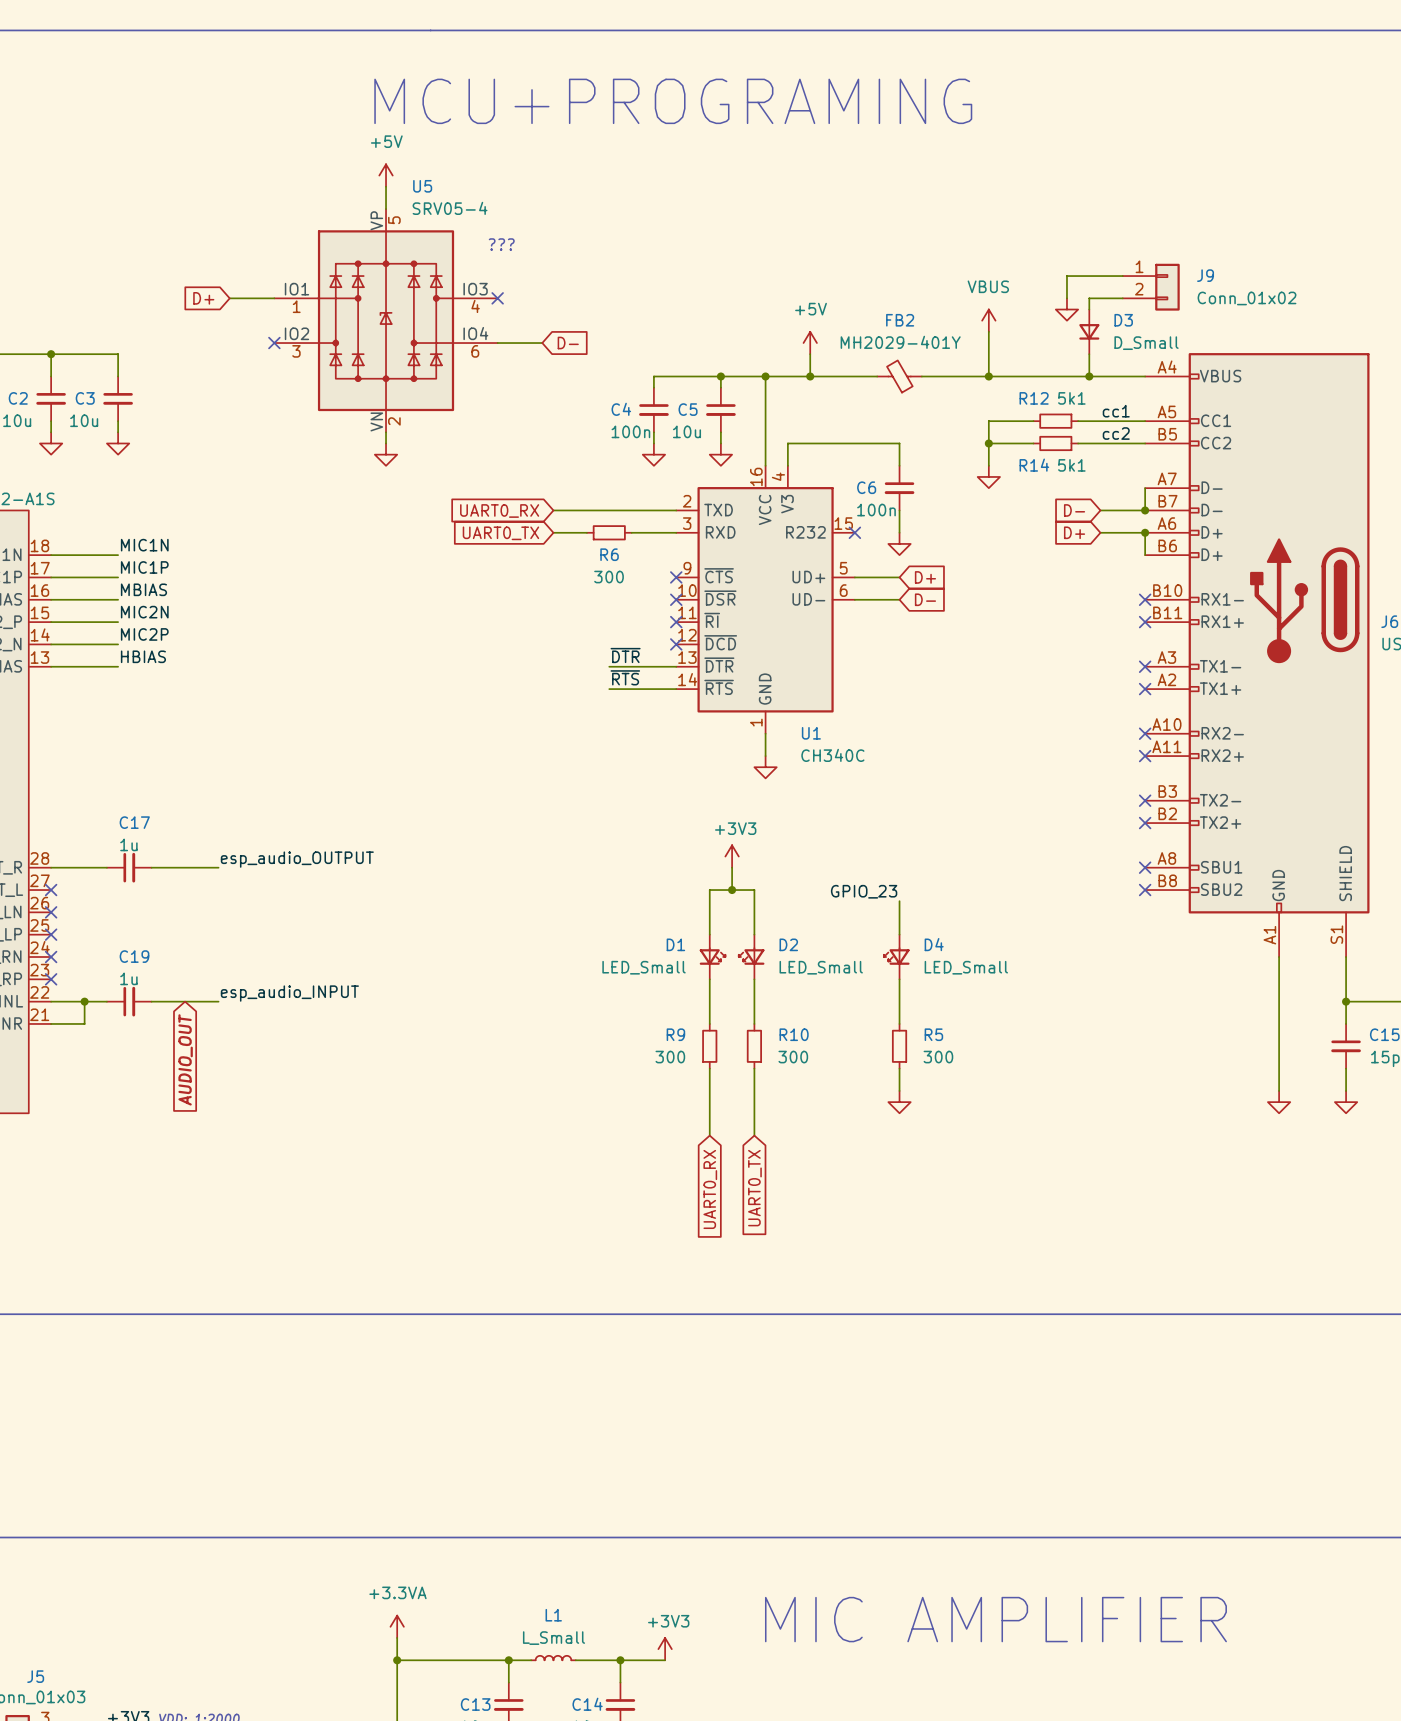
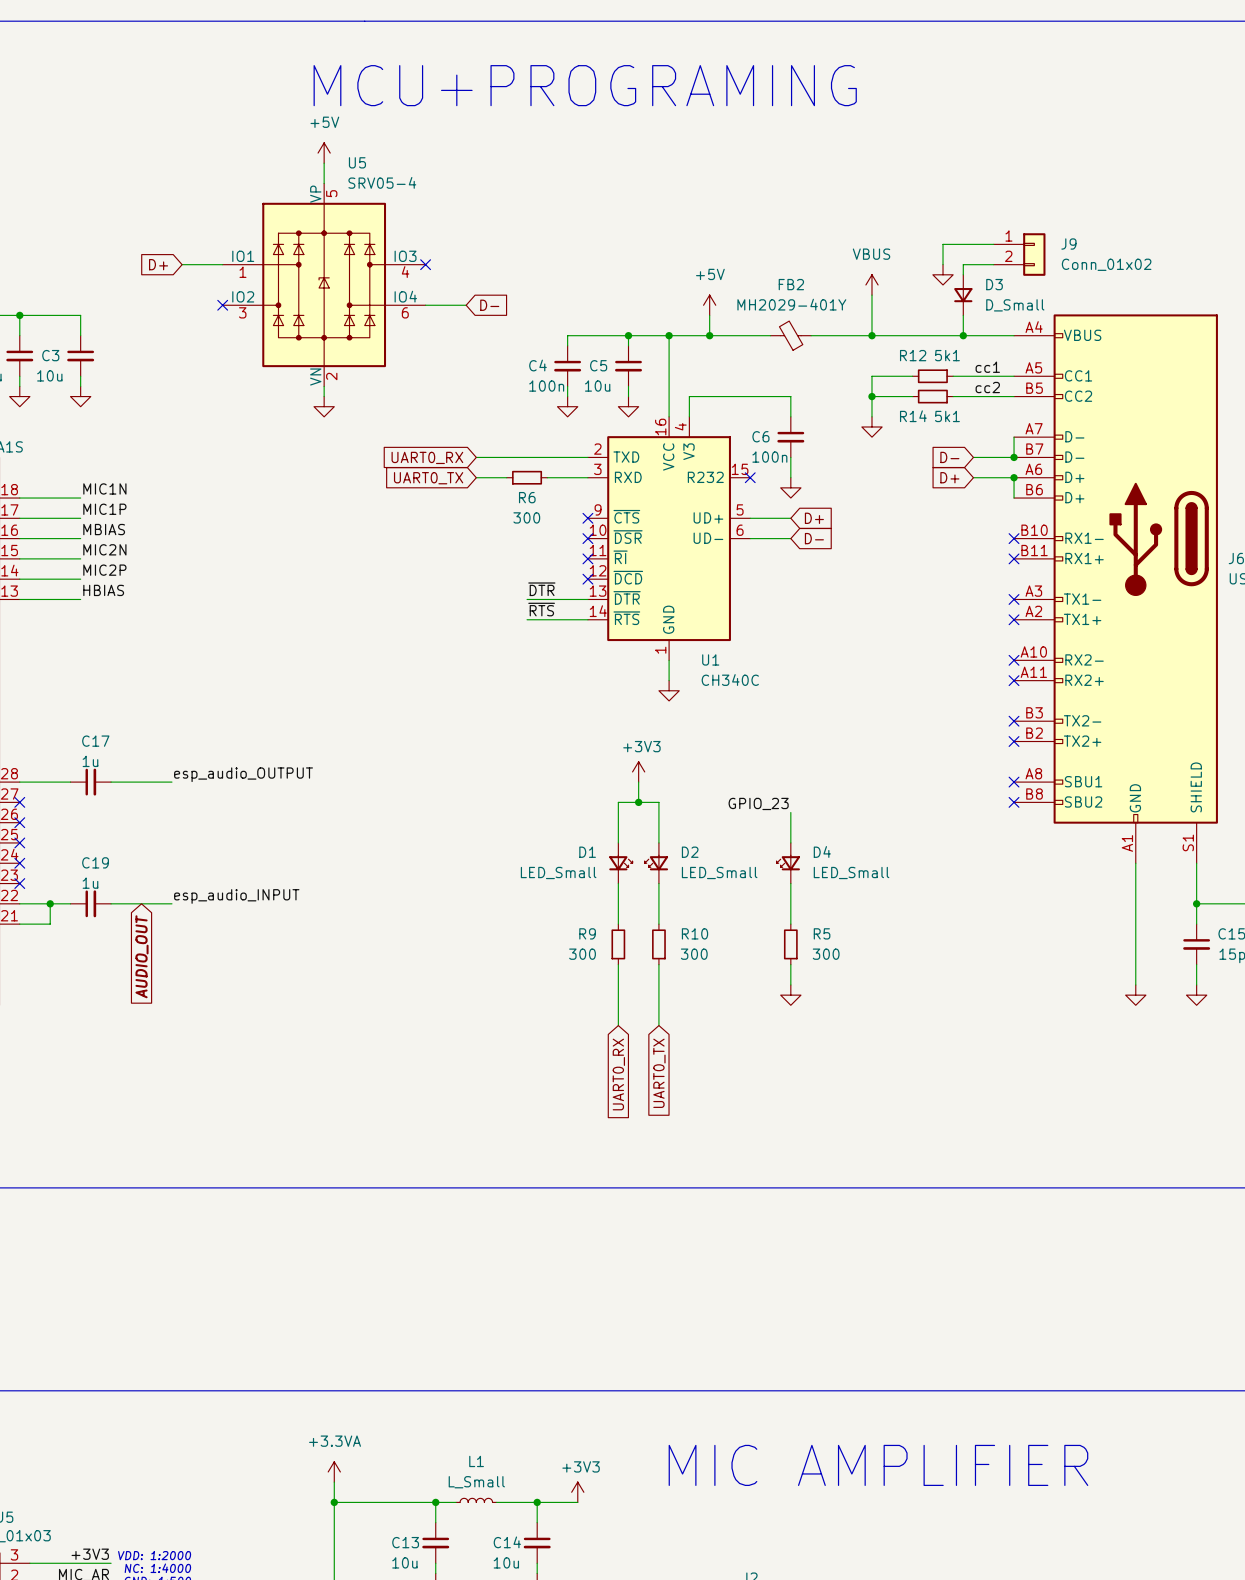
text: ??? (501, 244) -> none

